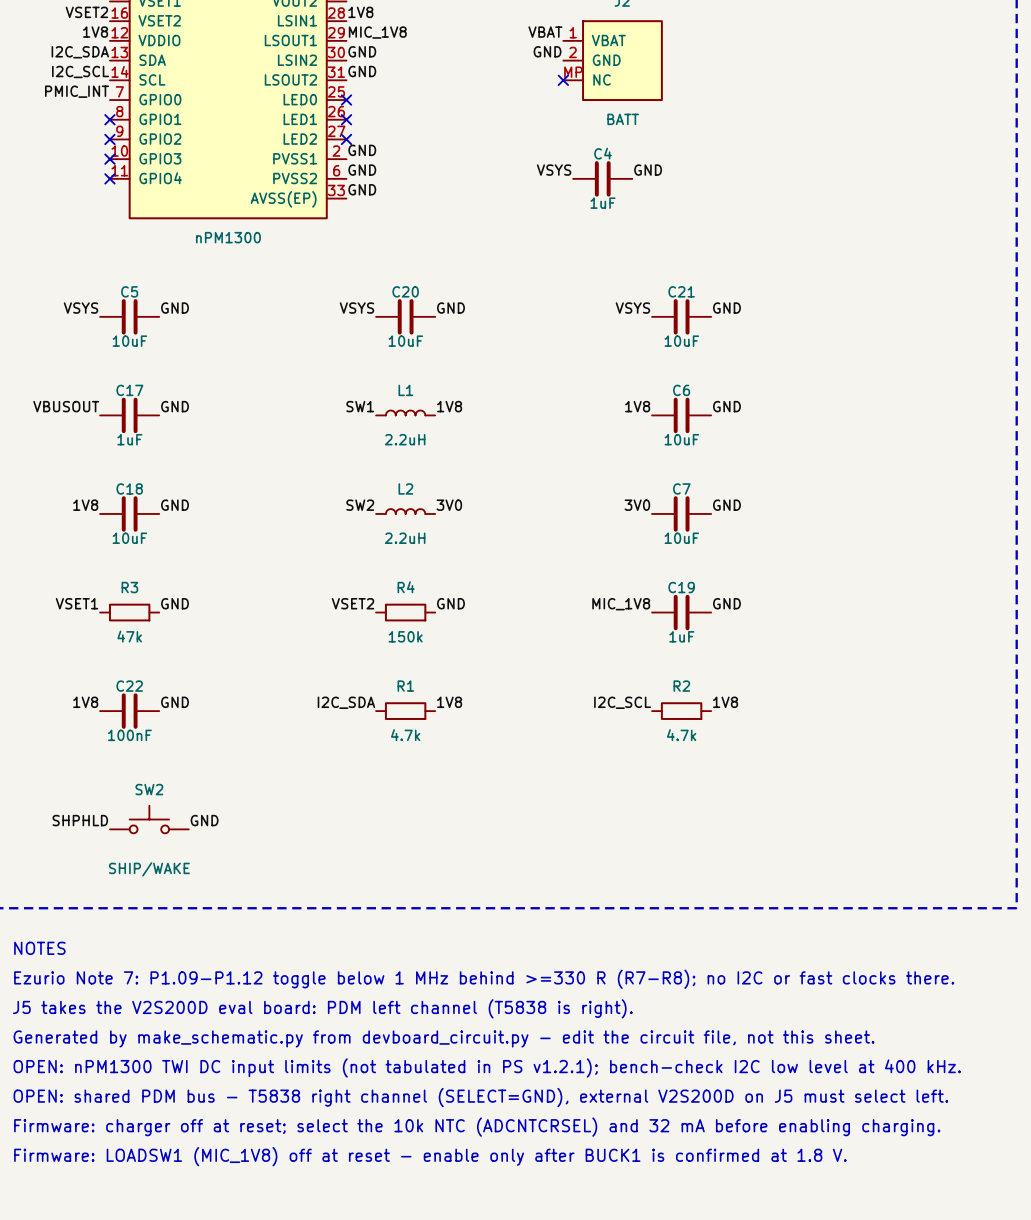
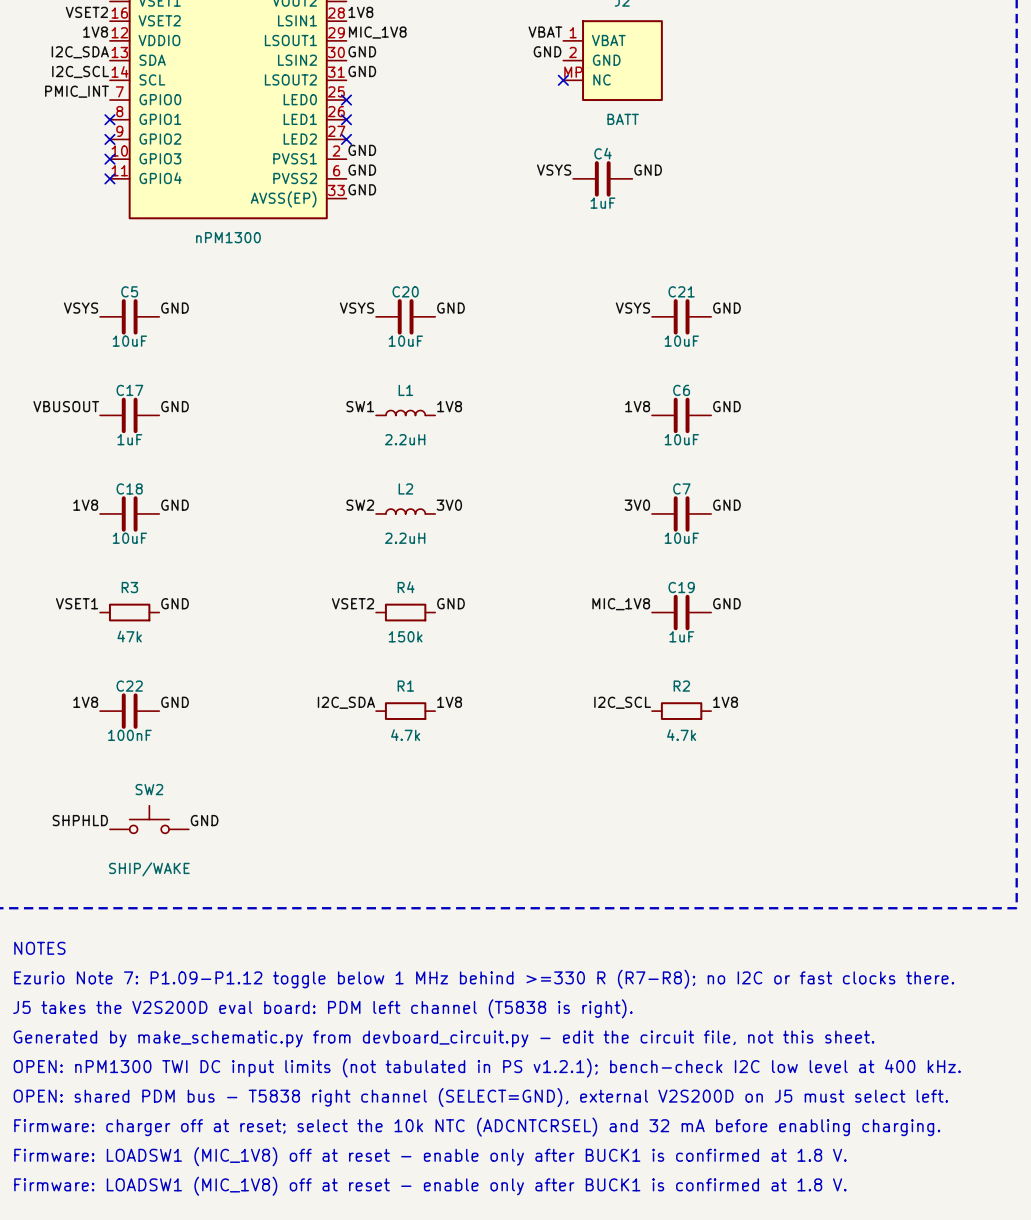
text: none -> Firmware: LOADSW1 (MIC_1V8) off at reset - enable only after BUCK1 is confirmed at 1.8 V. (430, 1186)

